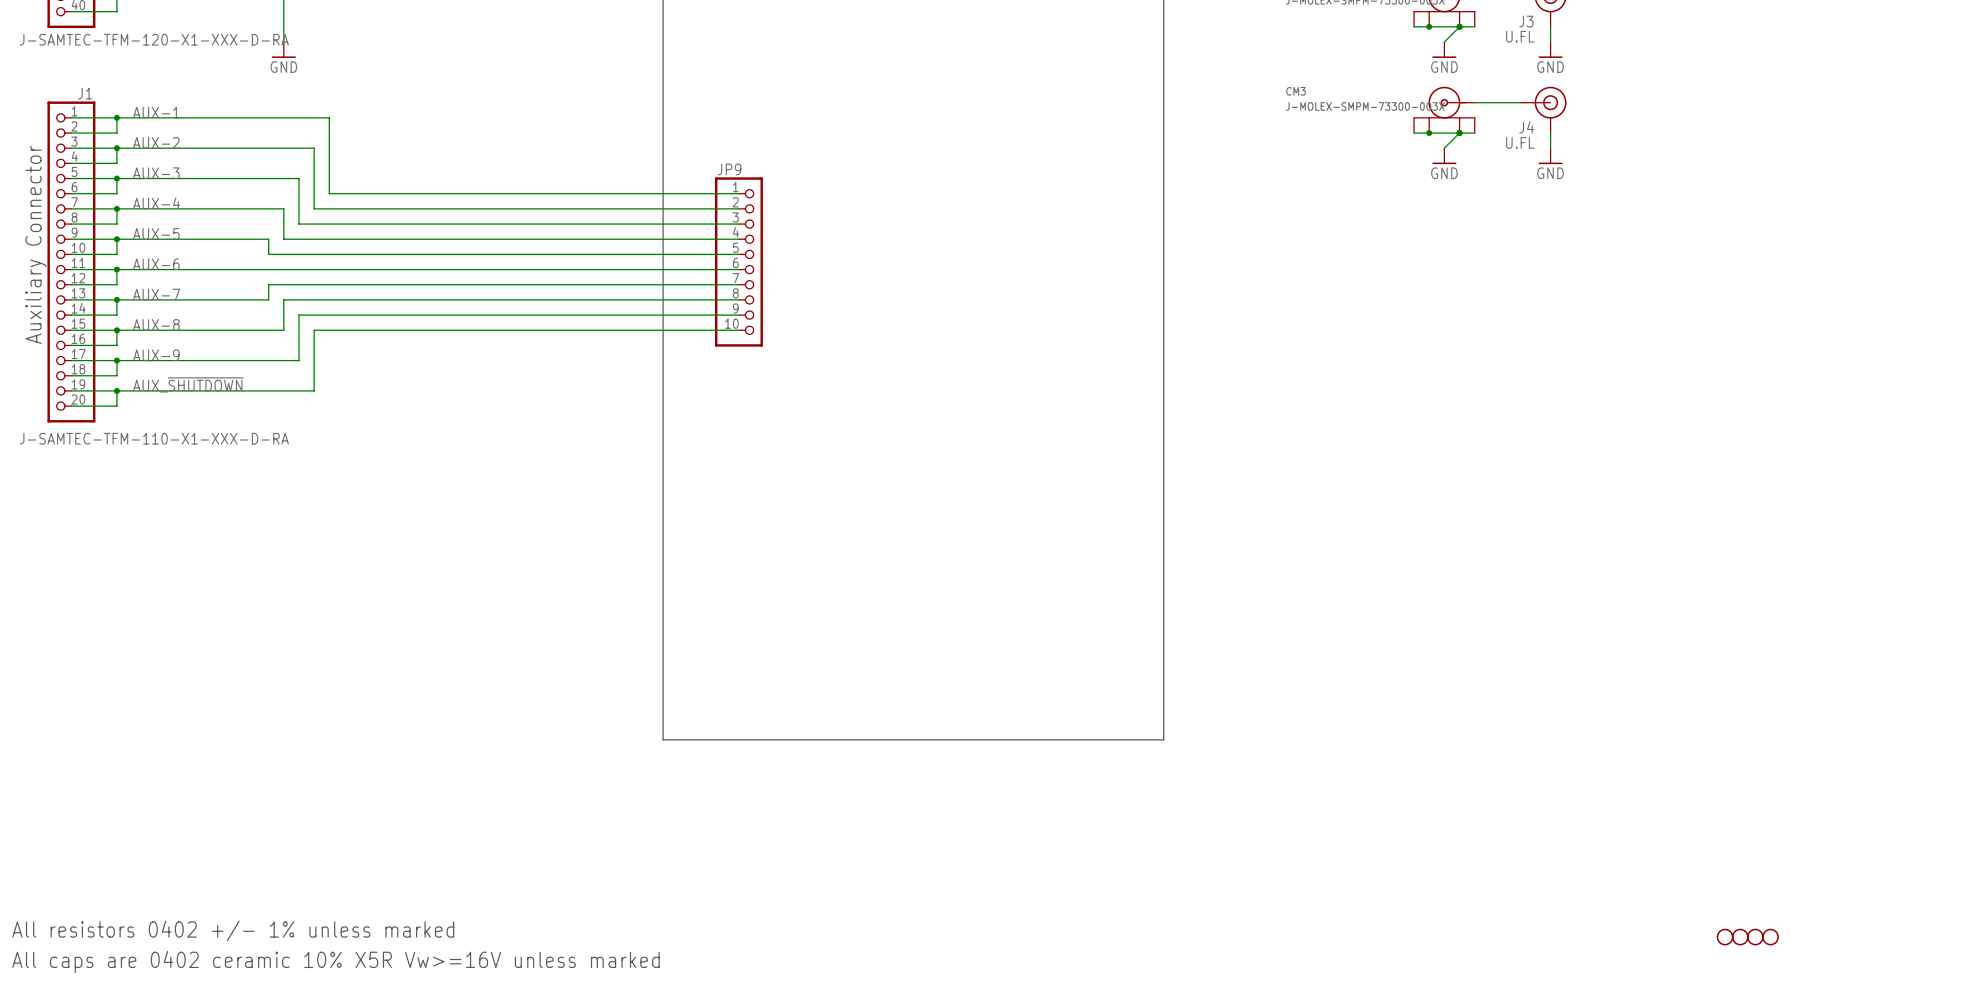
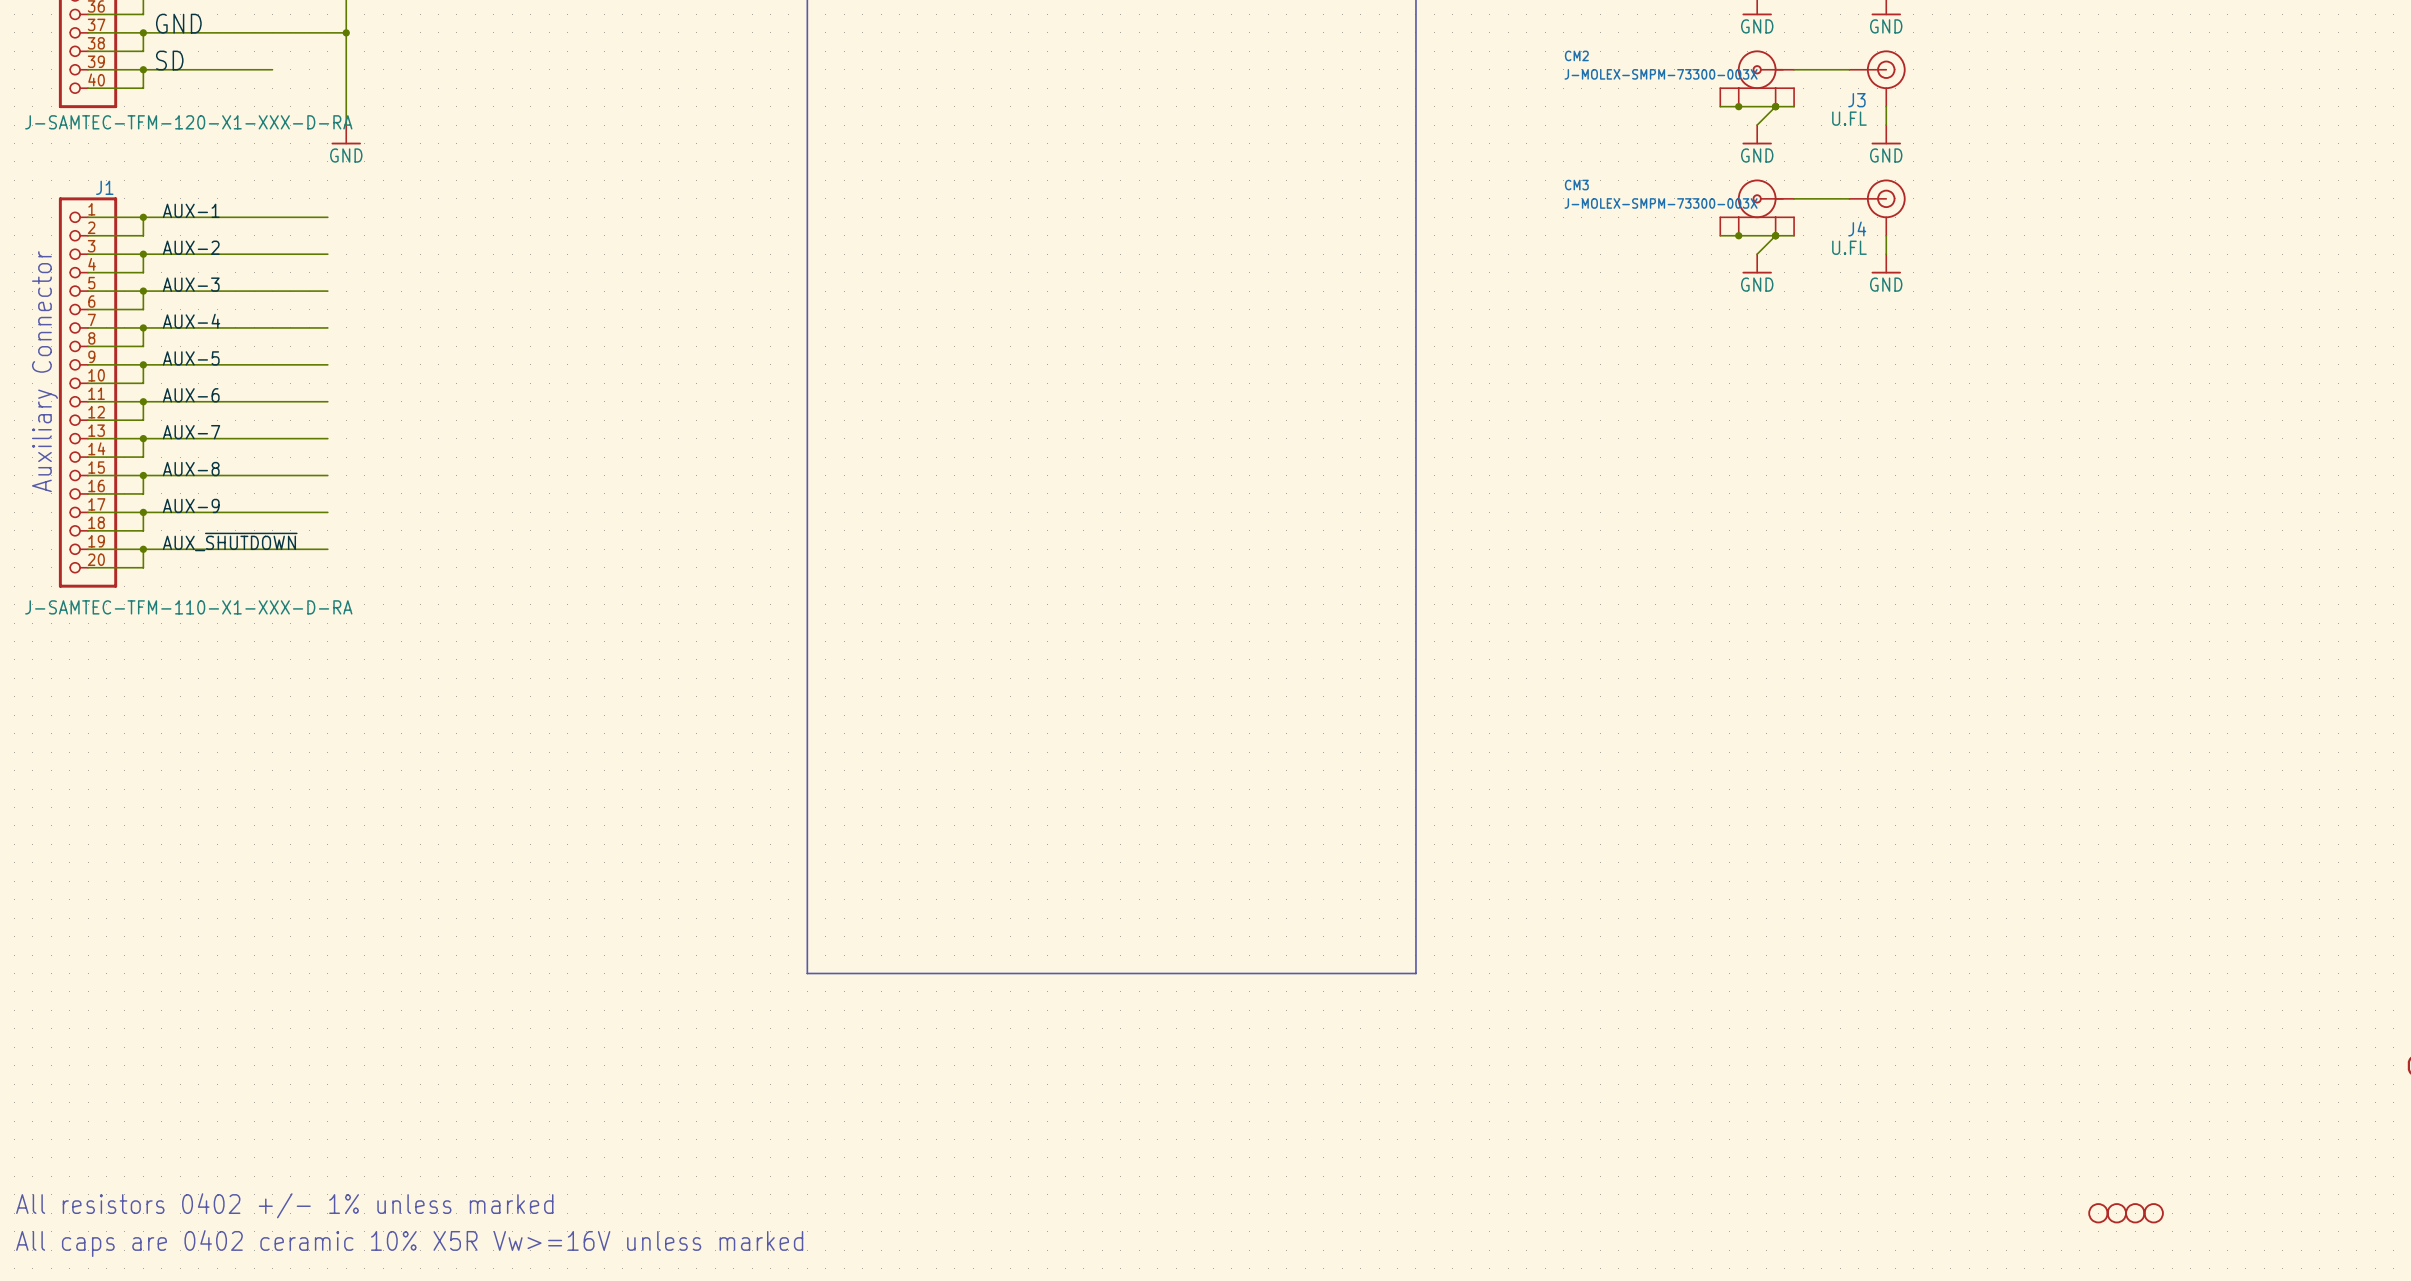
wire: (268, 117) (329, 117) (329, 193) (738, 193) -> none
wire: (268, 148) (314, 148) (314, 208) (738, 208) -> none
wire: (268, 178) (298, 178) (298, 224) (738, 224) -> none
wire: (268, 208) (283, 208) (283, 239) (738, 239) -> none
wire: (268, 239) (268, 254) (738, 254) -> none
JP9: (738, 261) -> none
wire: (268, 269) (738, 269) -> none
wire: (738, 284) (268, 284) (268, 299) -> none
wire: (738, 299) (283, 299) (283, 330) (268, 330) -> none
wire: (738, 315) (298, 315) (298, 360) (268, 360) -> none
wire: (738, 330) (314, 330) (314, 390) (268, 390) -> none

